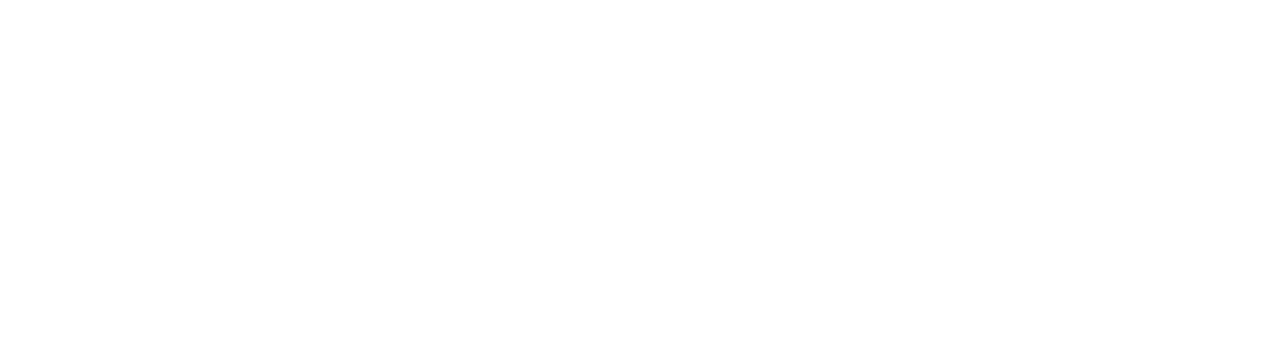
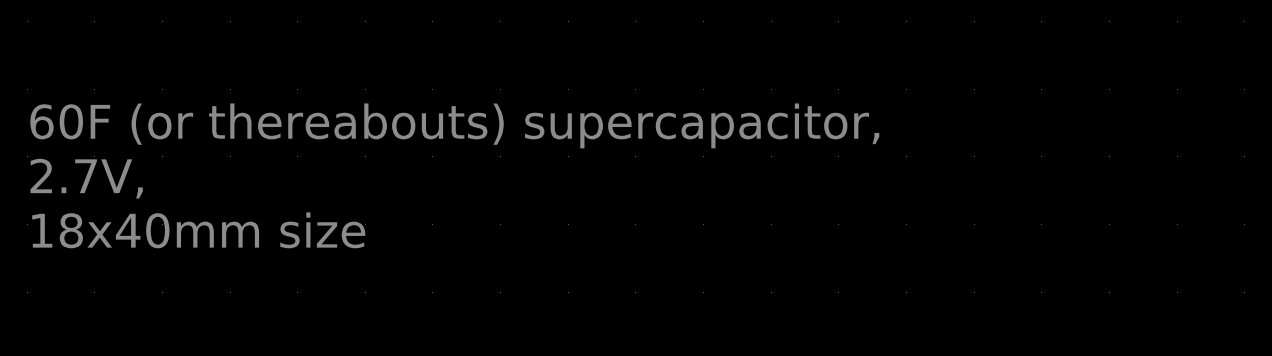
text: none -> 60F (or thereabouts) supercapacitor, (454, 125)
text: none -> 2.7V, (86, 178)
text: none -> 18x40mm size (198, 230)

